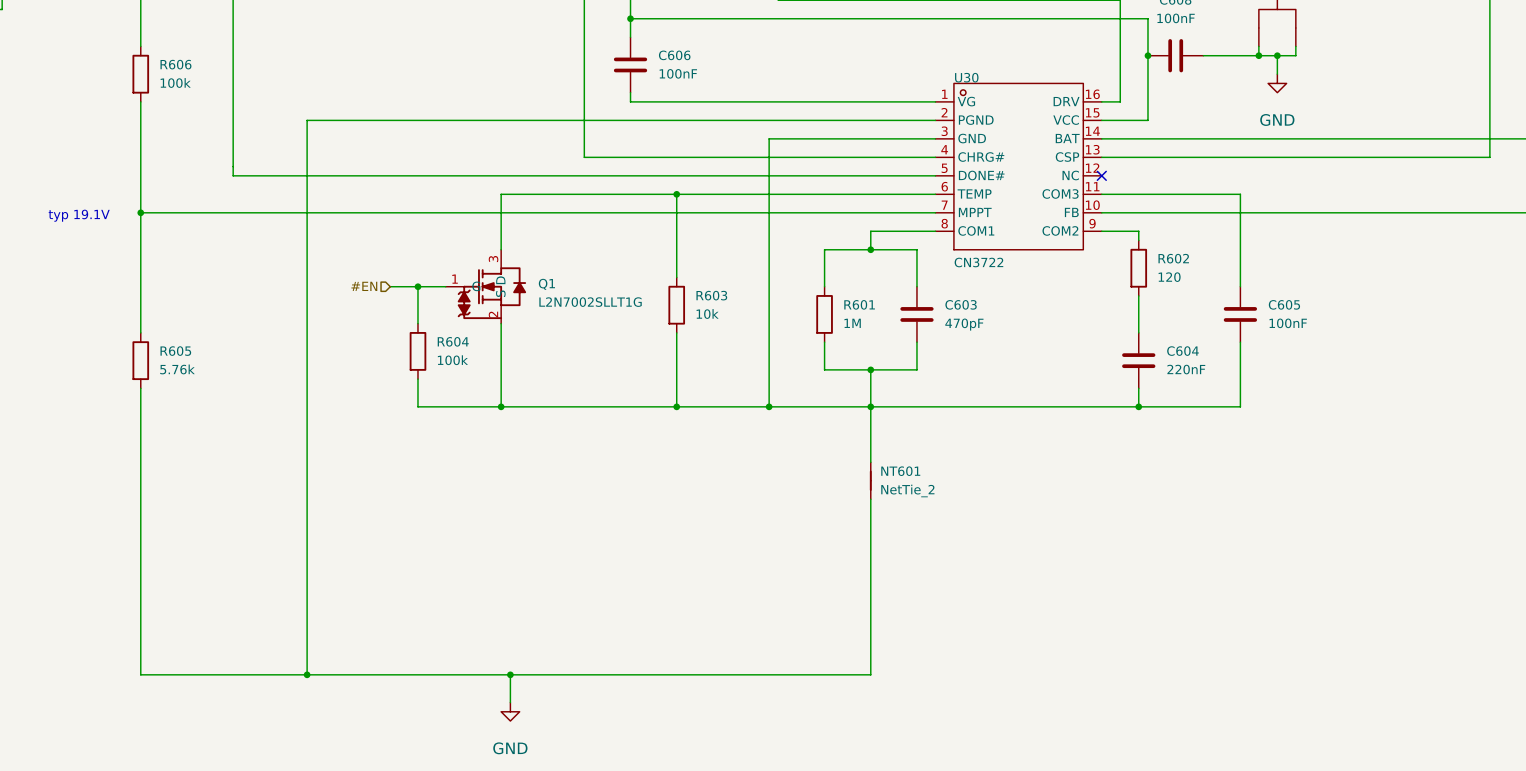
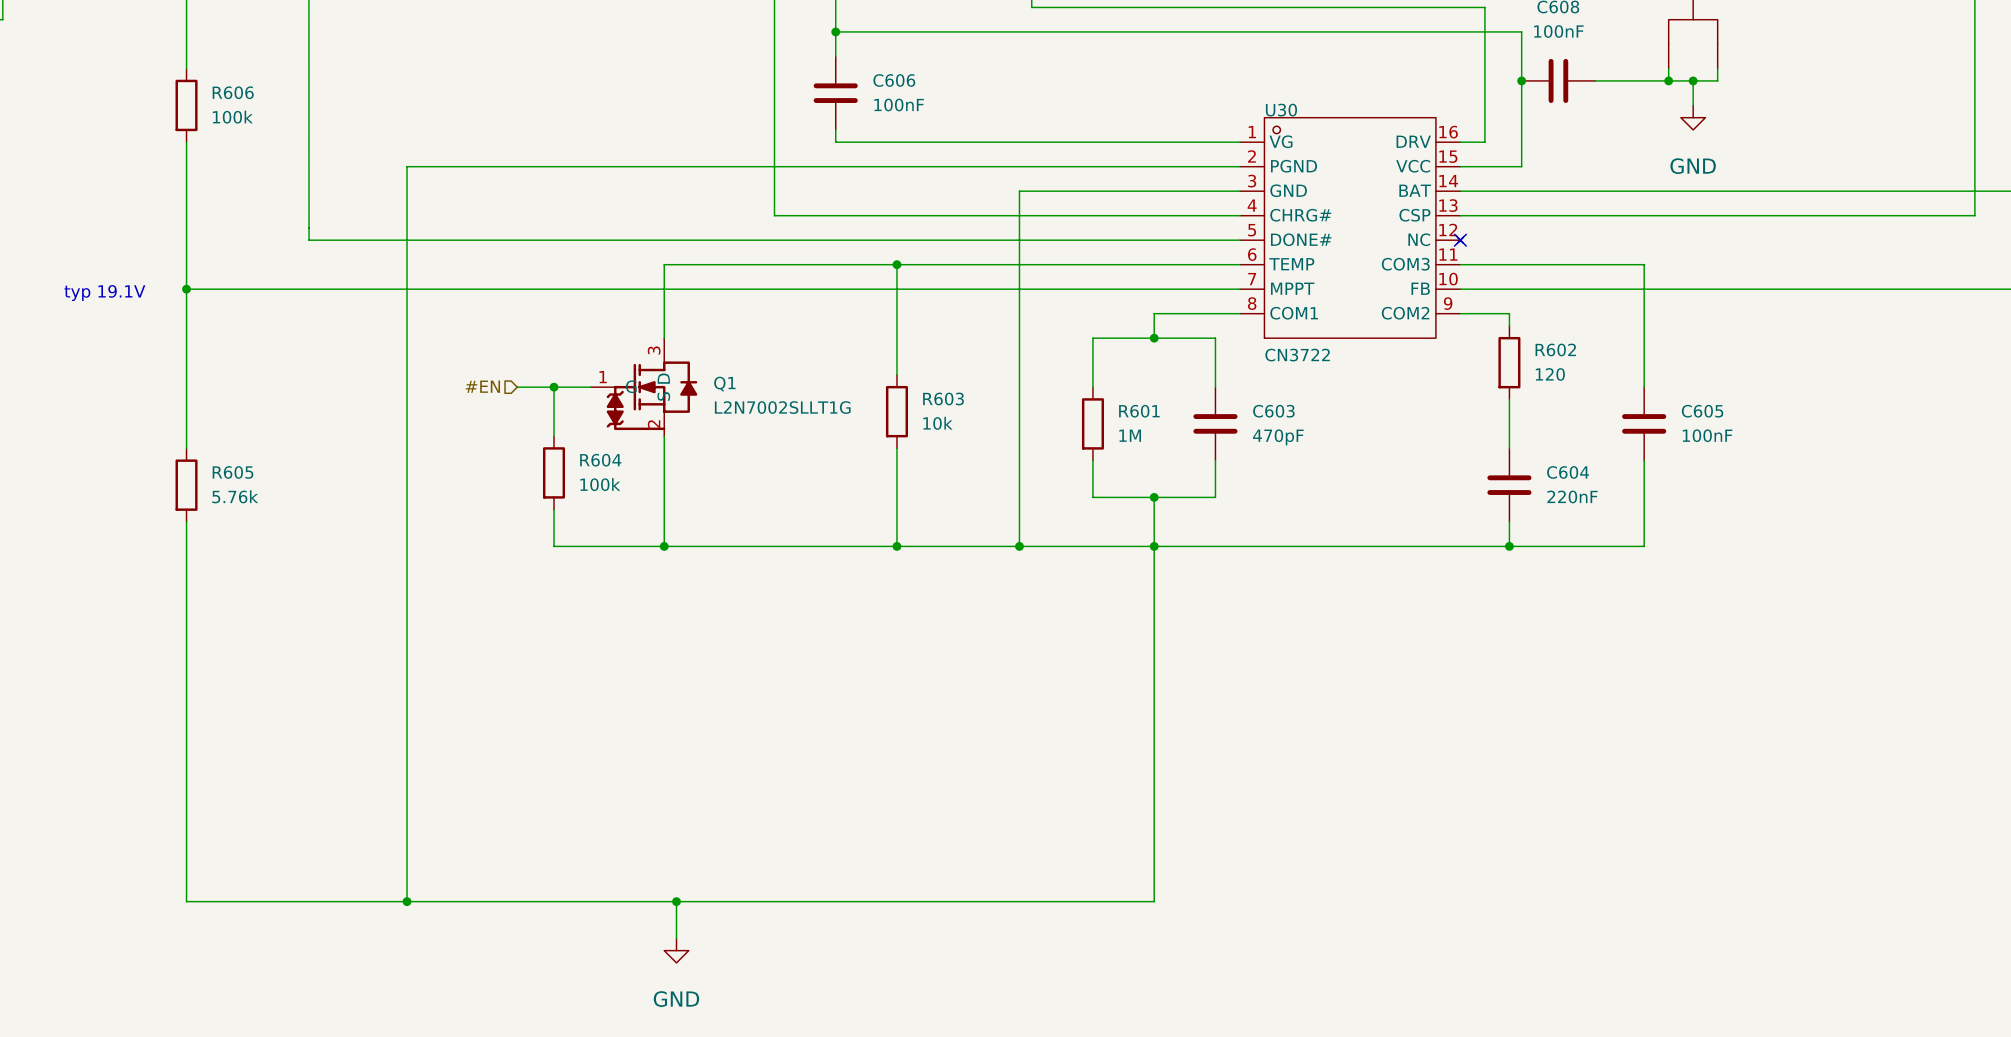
U30 symbol: [935, 83, 1102, 250] -> [1239, 117, 1464, 339]
NT601: NetTie_2 (870, 480) -> none

